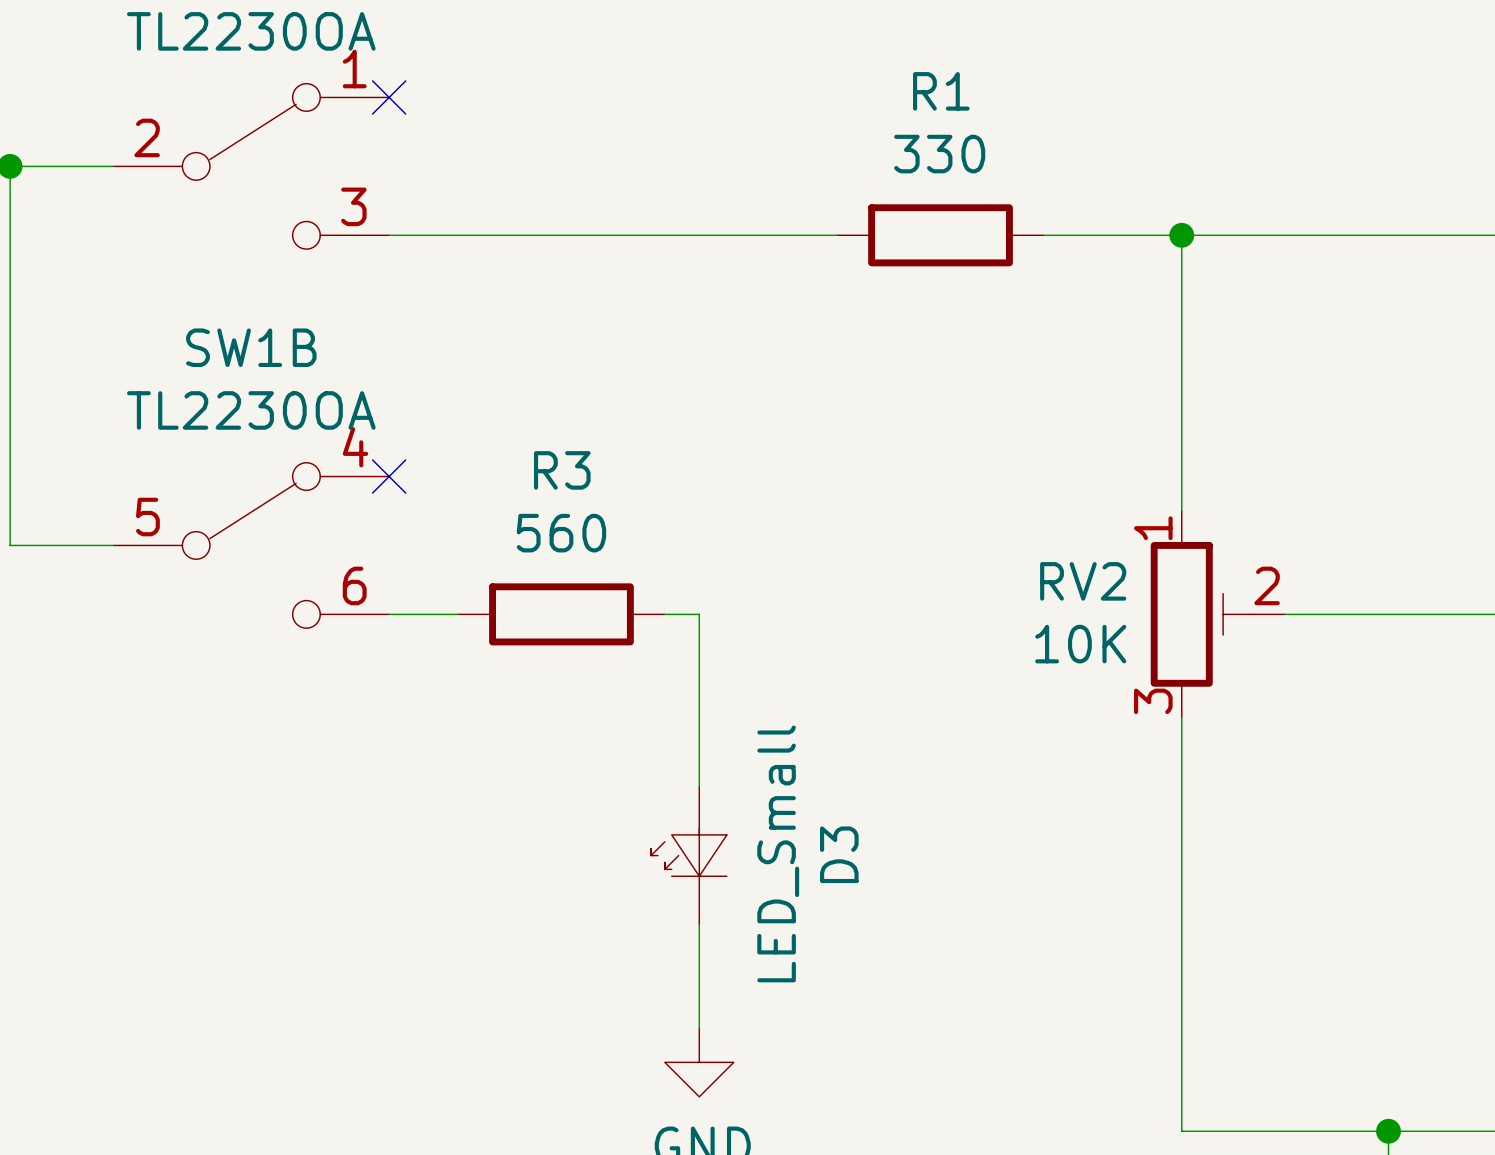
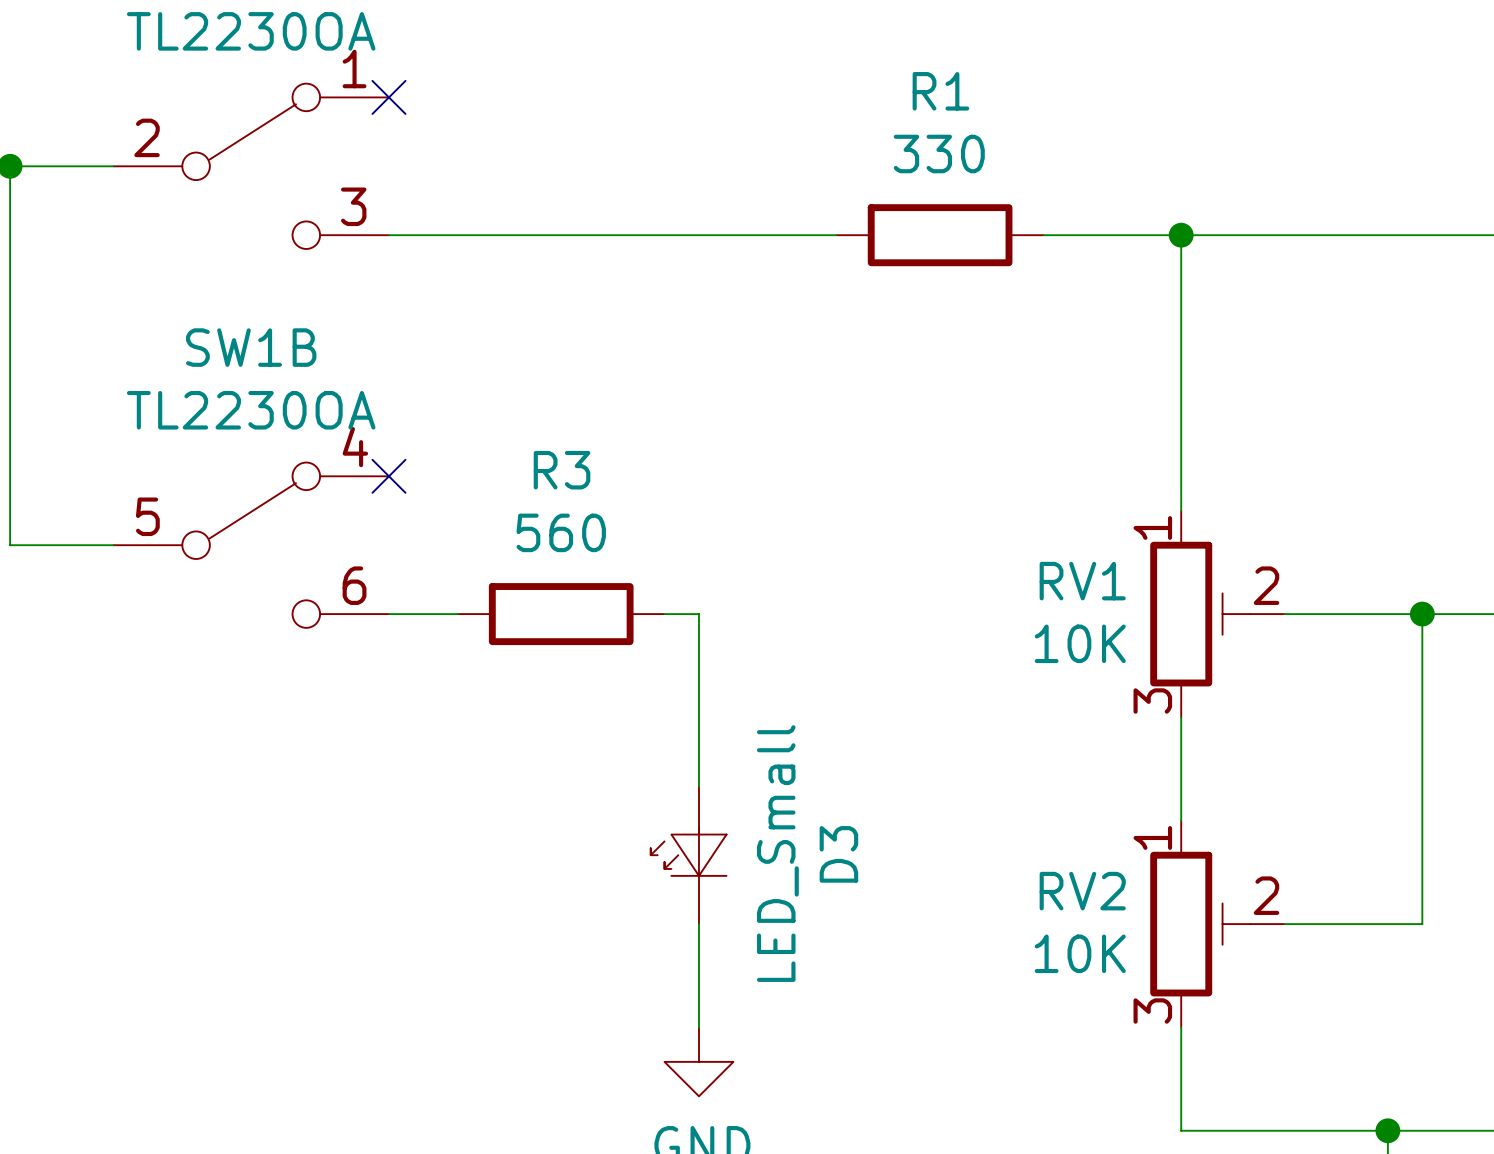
RV2 name: RV2 (1083, 581) -> RV1 (1082, 581)
wire: none -> (1422, 614) (1422, 924) (1284, 924)
junction: none -> (1422, 614)
wire: (1181, 821) (1181, 1027) -> none
RV2: none -> 10K (1217, 924)

